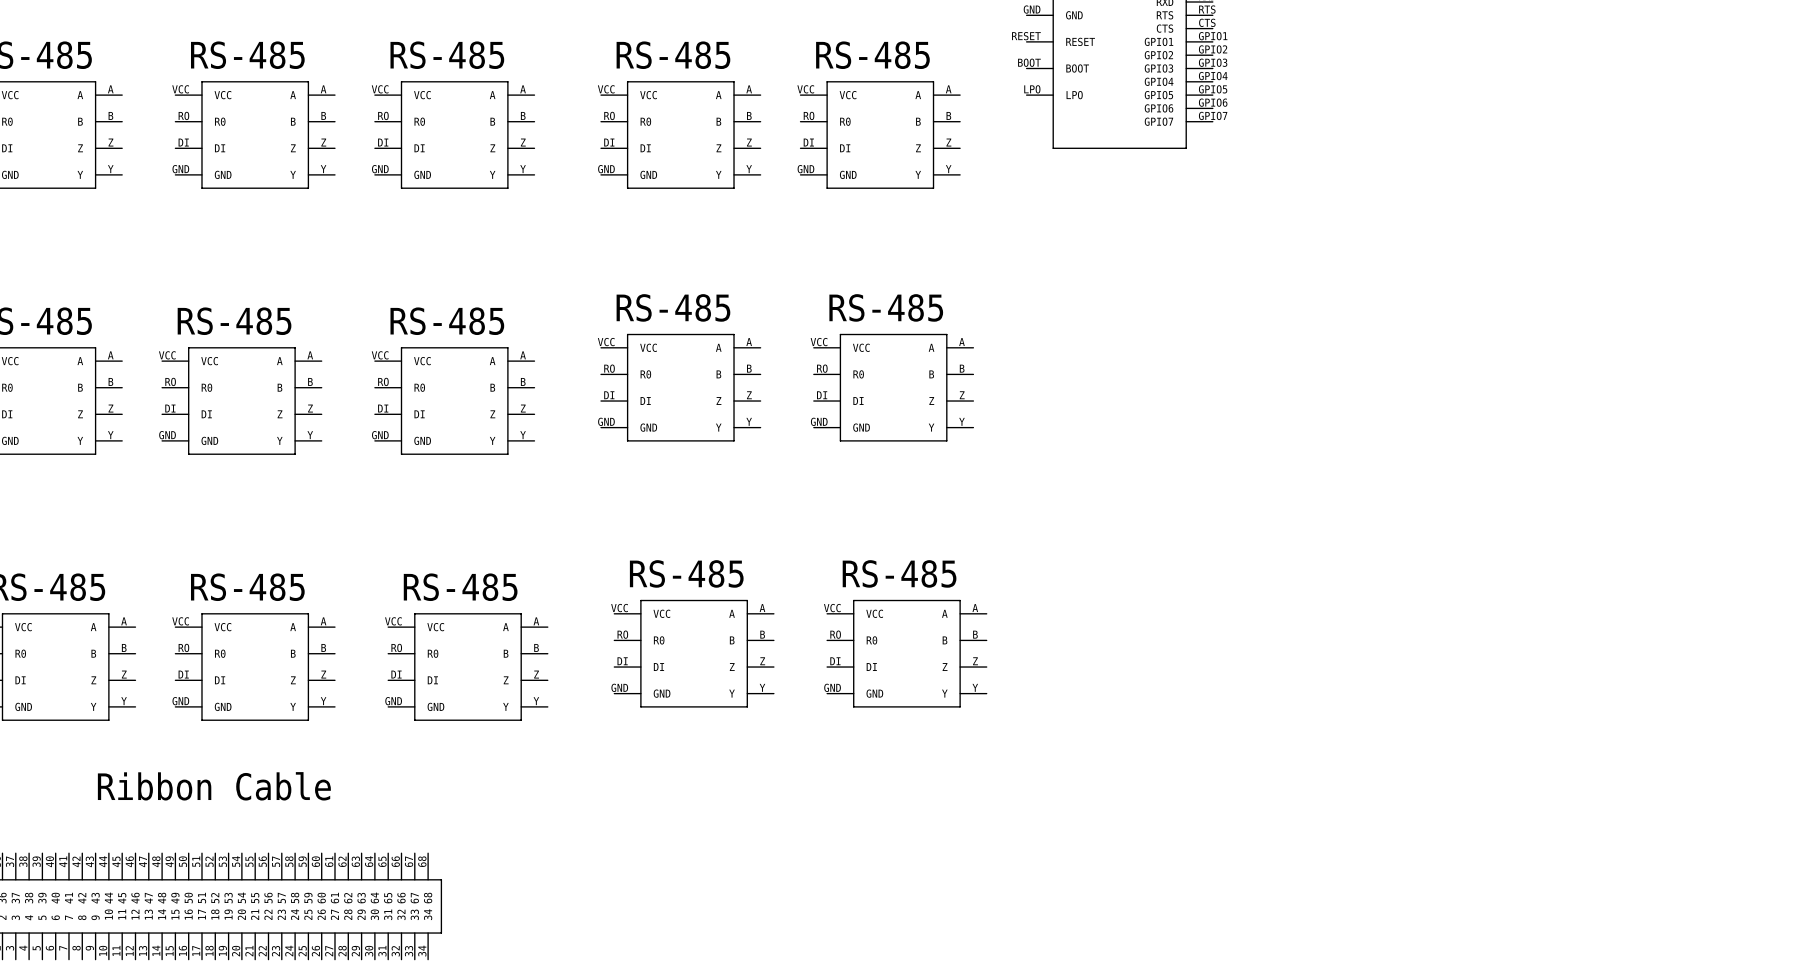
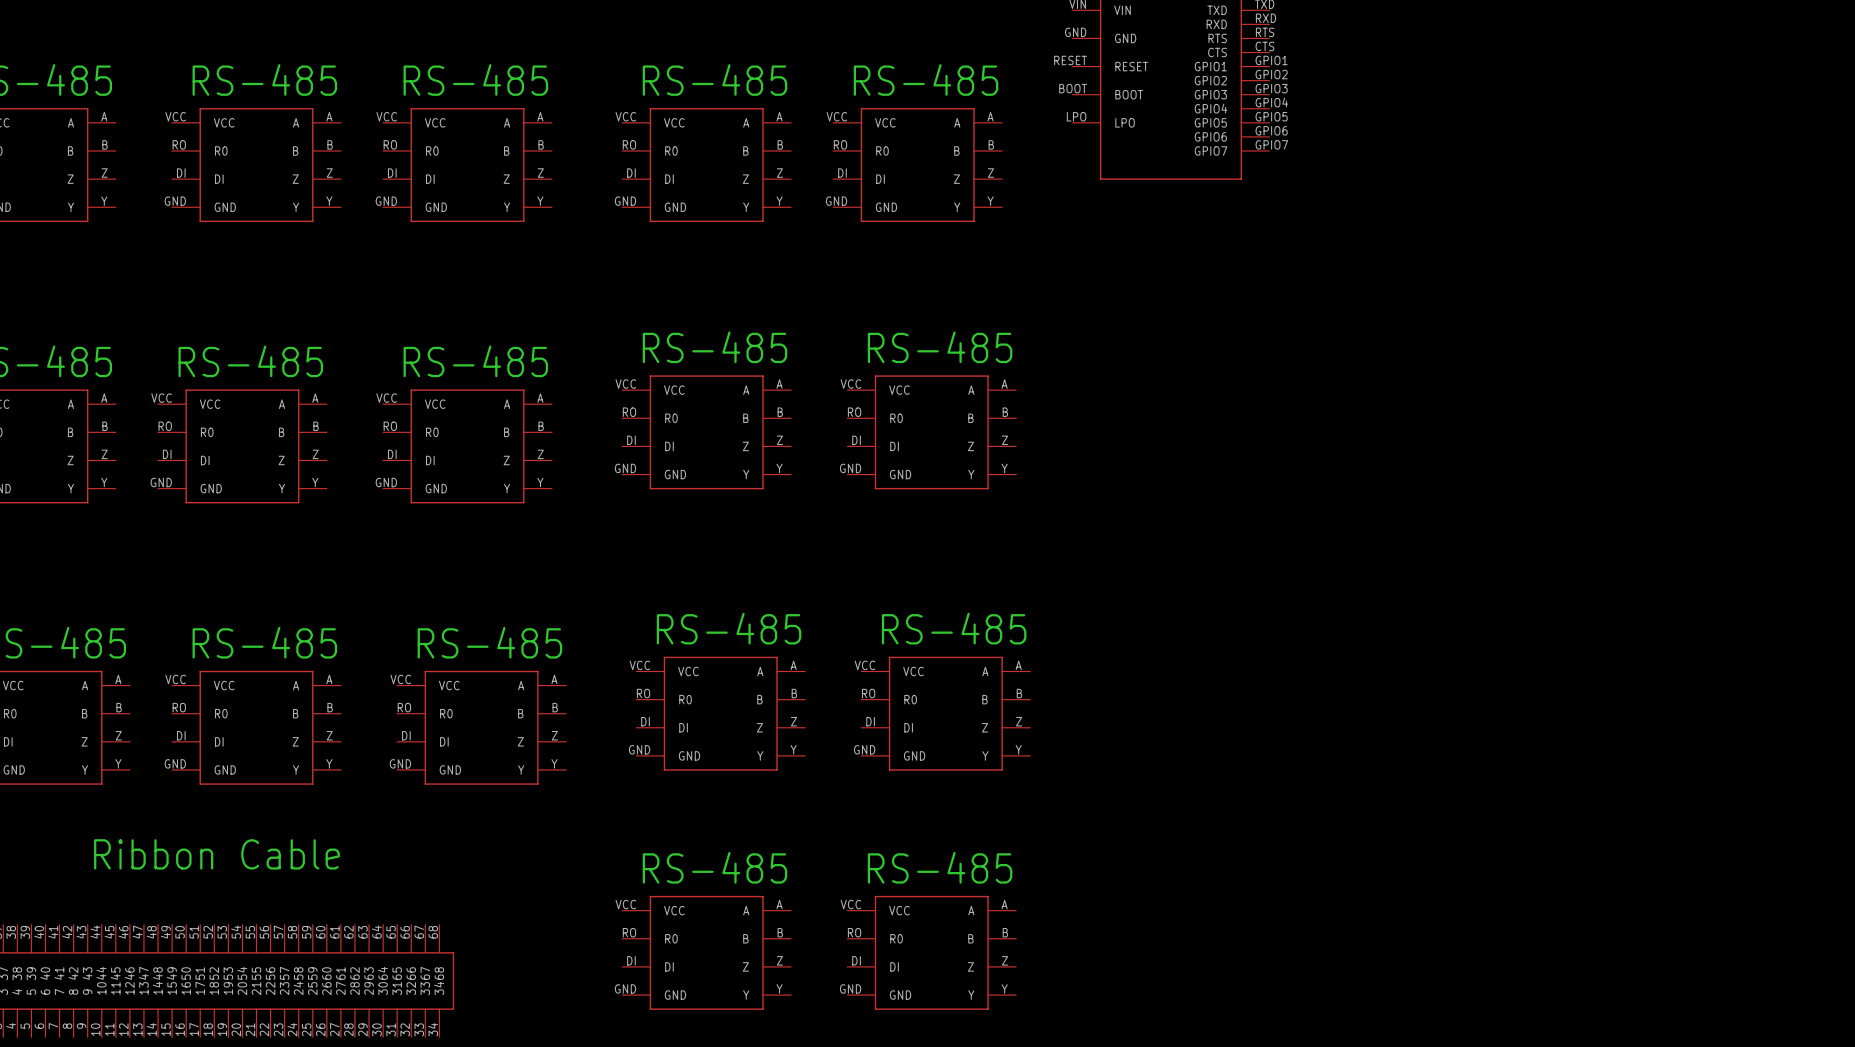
text: none -> RS-485 (714, 867)
text: none -> RS-485 (940, 867)
part: none -> (706, 952)
part: none -> (931, 952)

